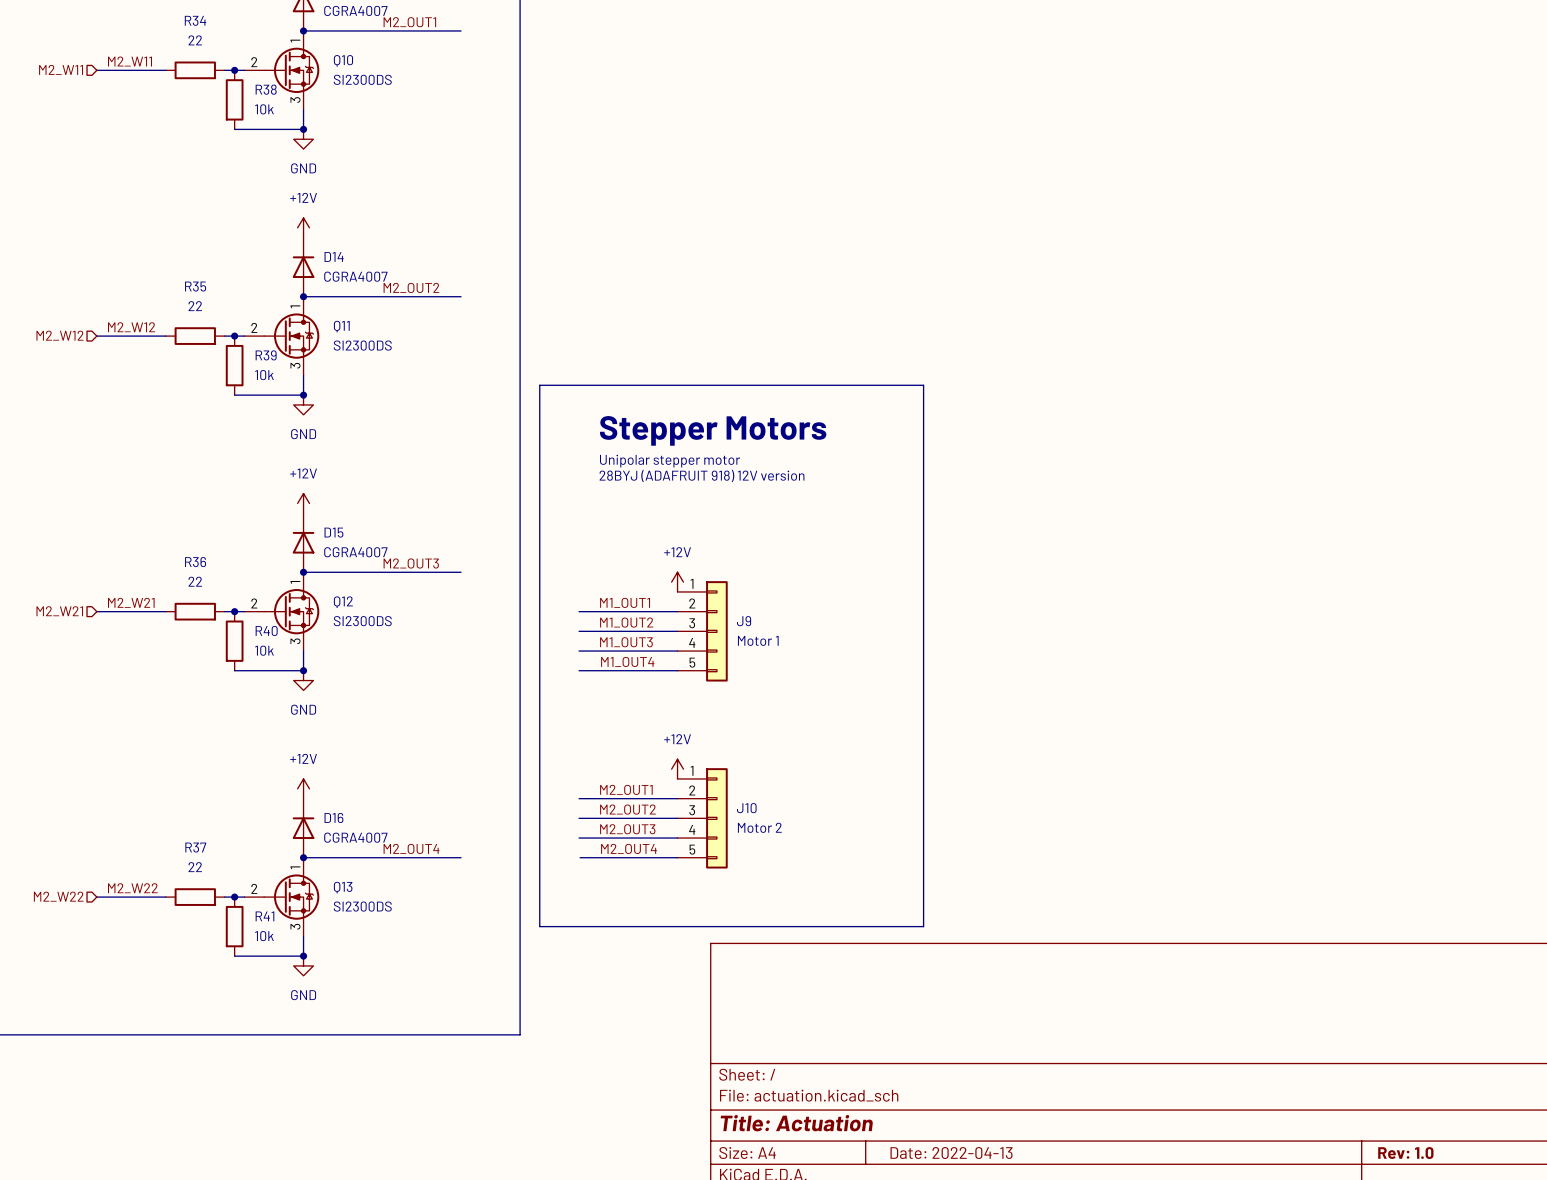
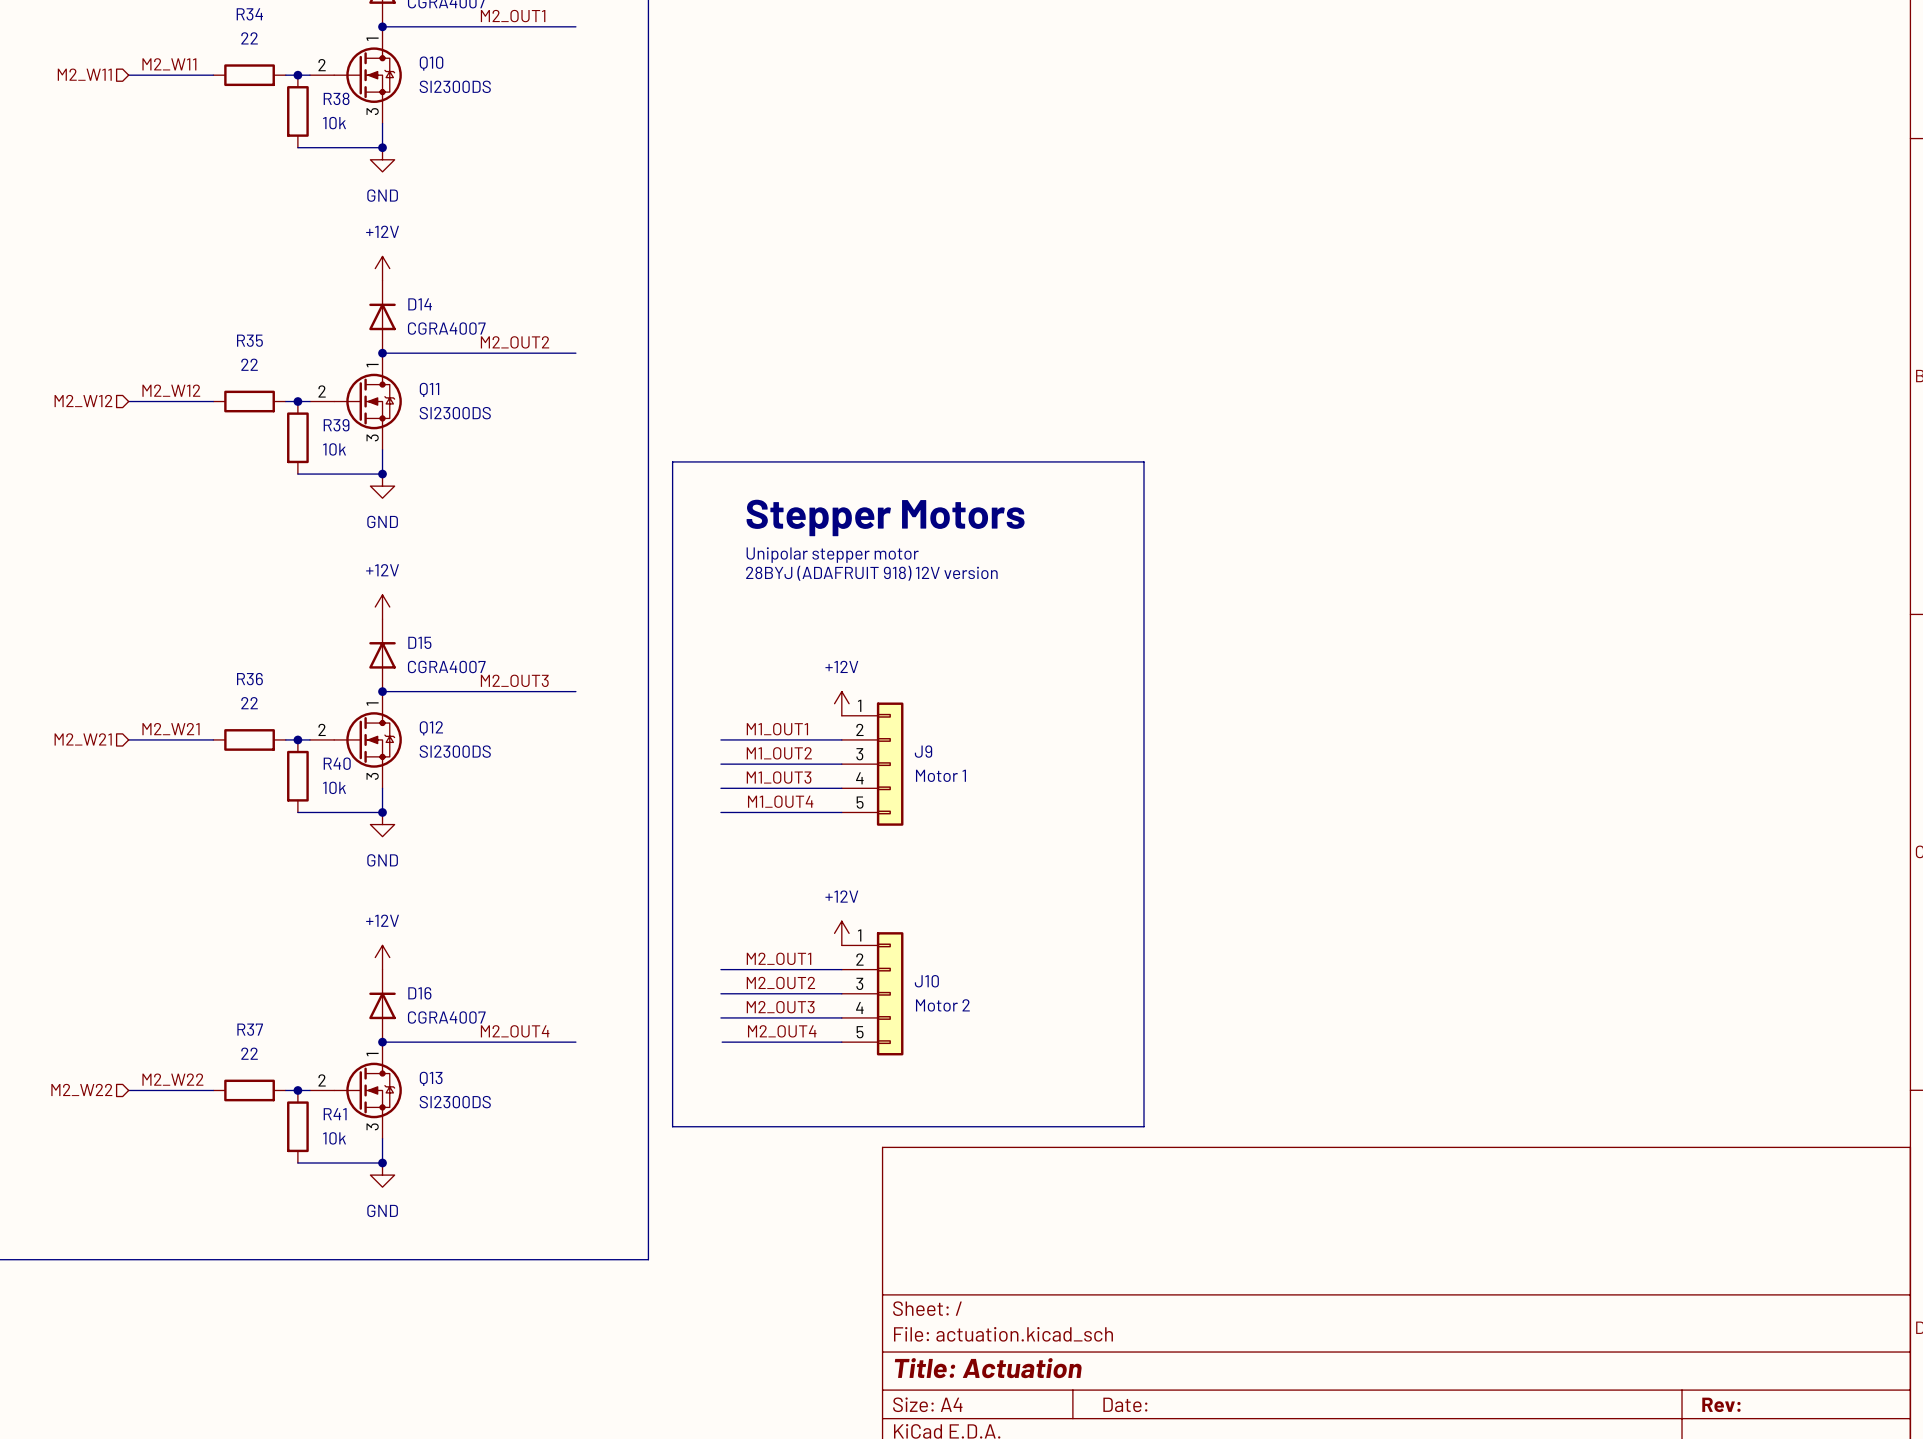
title block: Date: 2022-04-13 (951, 1153) -> Date: (1125, 1404)
title block: Rev: 1.0 (1405, 1153) -> Rev: (1721, 1404)

